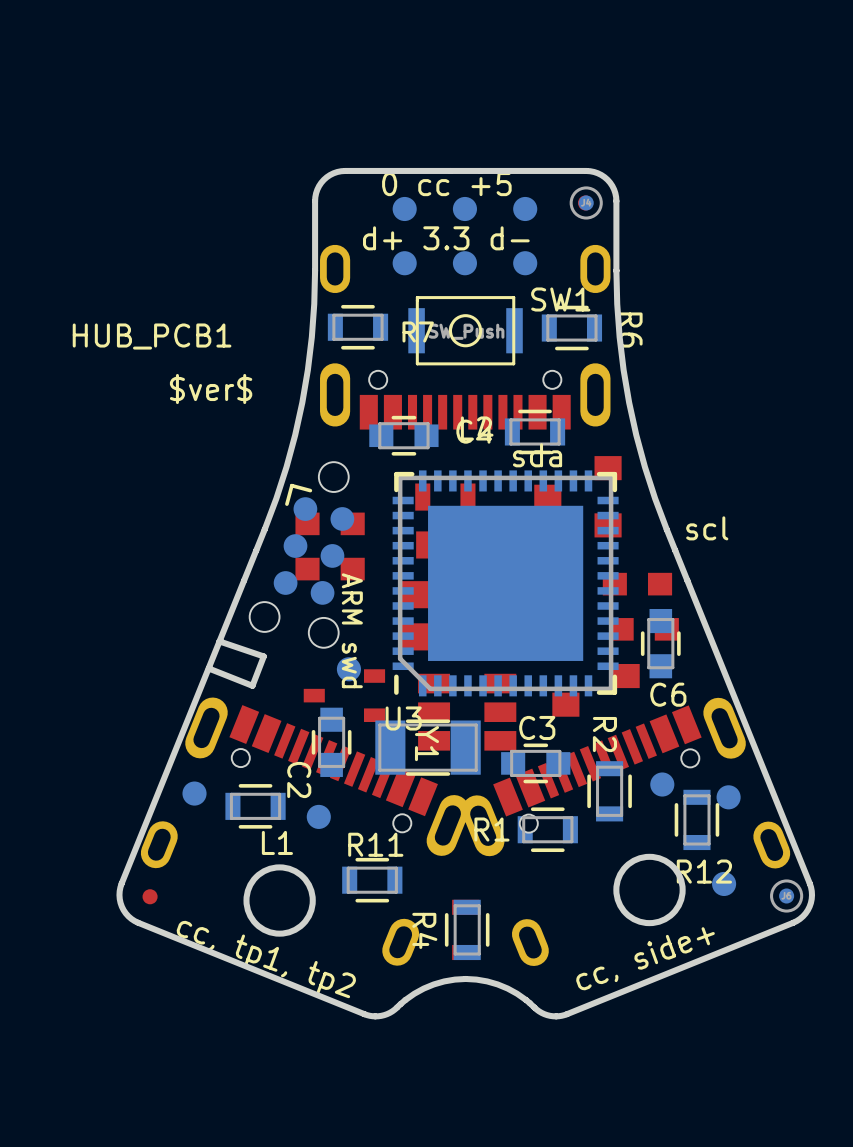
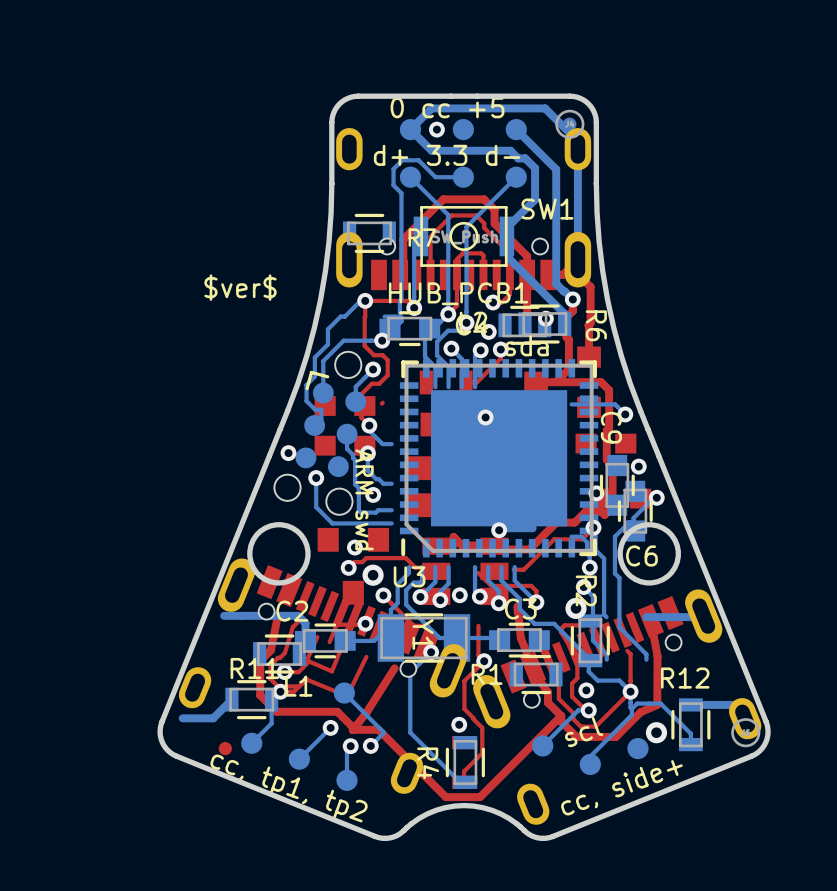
via: none -> (436, 129)
bottom track: none -> (516, 129) (556, 169) (556, 283) (572, 299)
bottom track: none -> (410, 177) (448, 215) (448, 314) (425, 337) (425, 356) (435, 367) (435, 387)
bottom track: none -> (463, 177) (435, 177) (418, 160) (402, 160) (393, 169) (393, 185) (401, 193) (401, 299) (399, 301) (401, 317)
bottom track: none -> (516, 177) (466, 226) (466, 322) (458, 330) (448, 330) (437, 341) (437, 355) (448, 366) (448, 387)
R6 position: (571, 328) -> (544, 324)
bottom track: none -> (418, 236) (414, 241) (414, 308)
text position: HUB_PCB1 (152, 336) -> HUB_PCB1 (458, 293)
part position: (465, 337) -> (463, 209)
bottom track: none -> (577, 259) (577, 141) (545, 108) (431, 108) (410, 129) (431, 150) (510, 150) (518, 158) (525, 158) (535, 168) (535, 199) (508, 225) (508, 258) (564, 314) (564, 324)
top track: none -> (400, 274) (403, 271) (403, 239) (443, 199) (484, 199) (494, 209) (494, 223) (527, 256) (527, 317)
top track: none -> (430, 274) (430, 236) (451, 215) (476, 215) (484, 223) (484, 227) (509, 253) (509, 294) (501, 302) (493, 302)
top track: none -> (483, 274) (483, 255) (481, 253) (462, 253) (457, 259) (457, 305) (448, 314)
top track: none -> (548, 274) (562, 274) (577, 259) (577, 274) (590, 286) (589, 357)
top track: none -> (572, 299) (572, 311) (566, 317) (568, 369) (555, 382)
via: none -> (572, 299)
bottom track: none -> (365, 300) (360, 300) (344, 316) (340, 316) (327, 329) (327, 344) (314, 357) (314, 376) (306, 384) (306, 401) (315, 409) (321, 409) (321, 418) (314, 425)
via: none -> (365, 300)
via: none -> (493, 302)
top track: none -> (414, 308) (407, 300) (365, 300) (364, 345) (373, 355) (382, 355) (387, 360) (387, 375) (379, 383) (371, 383) (361, 394) (361, 417) (369, 425)
via: none -> (414, 308)
via: none -> (448, 314)
bottom track: none -> (384, 316) (401, 317)
bottom track: none -> (401, 317) (401, 321) (382, 340) (343, 340) (323, 361) (323, 393)
via: none -> (545, 318)
via: none -> (466, 322)
via: none -> (488, 331)
via: none -> (382, 340)
bottom track: none -> (451, 348) (461, 358) (461, 387)
via: none -> (451, 348)
top track: none -> (500, 349) (500, 358) (476, 382) (466, 382)
via: none -> (500, 349)
bottom track: none -> (480, 350) (475, 356) (475, 387)
via: none -> (480, 350)
bottom track: none -> (373, 369) (355, 386) (355, 401)
via: none -> (373, 369)
top track: none -> (382, 402) (381, 403)
bottom track: none -> (571, 404) (615, 404) (625, 414)
text rotation: 0° (707, 528) -> 20° counterclockwise (584, 732)
text position: scl (707, 528) -> scl (584, 732)
via: none -> (625, 414)
via: none -> (485, 417)
top track: none -> (545, 423) (536, 414) (536, 382) (601, 382) (609, 390) (606, 459) (612, 465) (612, 507) (604, 514) (601, 511) (585, 511) (574, 522) (556, 522) (529, 549) (497, 549) (493, 545) (462, 545) (453, 536) (453, 545)
bottom track: none -> (369, 425) (369, 430) (382, 444) (391, 444)
via: none -> (369, 425)
bottom track: none -> (347, 434) (347, 448) (355, 460) (355, 484) (358, 488) (358, 510) (361, 512) (375, 512) (378, 510) (391, 510)
via: none -> (288, 453)
bottom track: none -> (367, 453) (367, 470) (383, 483) (391, 483)
via: none -> (367, 453)
part position: (637, 584) -> (605, 443)
via: none -> (638, 466)
bottom track: none -> (316, 478) (316, 507) (332, 523) (391, 523)
via: none -> (316, 478)
C9: none -> (617, 485)
via: none -> (596, 493)
via: none -> (373, 494)
bottom track: none -> (656, 497) (653, 497) (633, 518) (633, 520) (629, 522) (614, 536) (614, 573) (619, 577) (619, 627) (646, 654) (646, 659)
via: none -> (656, 497)
board edge: (219, 641) (263, 656) (252, 685) (208, 668) -> none
bottom track: none -> (593, 527) (595, 529) (595, 550) (604, 558) (604, 614) (606, 617)
top track: none -> (593, 527) (581, 539) (554, 539) (523, 569) (513, 569)
via: none -> (593, 527)
bottom track: none -> (532, 528) (501, 528) (499, 530)
via: none -> (499, 530)
part footprint: [303, 669, 386, 722] -> [317, 527, 390, 605]
part: (348, 669) -> none
bottom track: none -> (571, 536) (581, 536) (587, 542) (589, 567)
part: (596, 676) -> none
via: none -> (354, 547)
bottom track: none -> (408, 567) (408, 573) (397, 584) (397, 603) (390, 609) (390, 638)
bottom track: none -> (422, 567) (422, 580) (420, 582) (413, 582) (406, 590) (406, 604) (439, 638) (497, 638) (499, 640)
top track: none -> (428, 567) (415, 567) (405, 558) (366, 558) (362, 562) (354, 562) (348, 567)
bottom track: none -> (435, 567) (435, 582) (420, 596)
bottom track: none -> (448, 567) (448, 583) (440, 591) (440, 600)
bottom track: none -> (475, 567) (475, 591) (479, 596)
bottom track: none -> (488, 567) (488, 580) (498, 591) (498, 603)
bottom track: none -> (501, 567) (501, 580) (519, 598) (519, 608) (534, 623) (554, 623) (588, 658) (588, 671) (597, 680) (619, 680) (630, 691) (631, 708)
bottom track: none -> (514, 567) (514, 580) (536, 602)
via: none -> (589, 567)
via: none -> (348, 567)
top track: none -> (478, 573) (491, 585) (531, 585) (536, 591) (536, 602)
via: none -> (373, 575)
bottom track: none -> (583, 587) (593, 596) (593, 640) (606, 654) (606, 659)
via: none -> (583, 587)
top track: none -> (383, 595) (413, 625) (428, 625)
via: none -> (383, 595)
via: none -> (459, 595)
via: none -> (479, 596)
via: none -> (420, 596)
C2 rotation: 0° (331, 742) -> 90° clockwise (325, 640)
C2 position: (331, 742) -> (325, 640)
via: none -> (440, 600)
Y1 position: (428, 747) -> (423, 638)
via: none -> (536, 602)
via: none -> (498, 603)
via: none -> (576, 608)
top track: none -> (517, 611) (517, 606) (520, 638) (533, 668) (547, 692) (547, 702) (561, 715)
bottom track: none -> (224, 615) (298, 615) (305, 623) (305, 640)
C3 position: (535, 763) -> (519, 640)
bottom track: none -> (703, 616) (646, 617)
top track: none -> (276, 620) (270, 650) (260, 661) (260, 695) (276, 711) (337, 711) (352, 727) (352, 730) (366, 712) (394, 668)
top track: none -> (650, 621) (657, 656) (657, 704) (640, 712) (615, 736) (576, 736) (561, 721) (561, 715)
top track: none -> (297, 622) (292, 627) (284, 653) (270, 665) (270, 678) (277, 686) (299, 686)
top track: none -> (365, 623) (363, 626) (362, 624) (336, 624) (329, 642)
via: none -> (365, 623)
top track: none -> (478, 625) (478, 655) (484, 661) (464, 680) (464, 708) (482, 727) (482, 753) (464, 771) (464, 782)
bottom track: none -> (387, 626) (373, 640) (345, 640)
part: (662, 784) -> none
top track: none -> (317, 637) (306, 660) (331, 671) (341, 647)
part: (194, 793) -> none
top track: none -> (598, 642) (590, 623) (564, 625) (562, 627) (560, 632) (577, 655) (577, 678) (572, 683) (572, 696) (585, 710) (588, 710)
part: (728, 797) -> none
top track: none -> (627, 650) (630, 654) (630, 691) (595, 726) (580, 726) (573, 719) (573, 713) (558, 698) (558, 679) (549, 662)
bottom track: none -> (431, 652) (410, 673) (410, 732) (460, 782) (465, 782)
via: none -> (431, 652)
top track: none -> (366, 656) (347, 696) (306, 679) (293, 691) (280, 691)
top track: none -> (309, 661) (298, 672) (284, 672)
via: none -> (484, 661)
part position: (318, 816) -> (344, 693)
R12 position: (696, 819) -> (690, 724)
via: none -> (284, 672)
part position: (626, 831) -> (617, 707)
via: none -> (586, 690)
via: none -> (280, 691)
via: none -> (630, 691)
bottom track: none -> (344, 693) (384, 732) (370, 745)
bottom track: none -> (231, 699) (213, 718) (182, 718)
bottom track: none -> (271, 699) (271, 723) (251, 743)
bottom track: none -> (690, 704) (731, 704) (745, 718)
bottom track: none -> (631, 708) (631, 714) (590, 756) (590, 764)
bottom track: none -> (631, 708) (637, 703) (660, 703) (690, 733) (690, 744) (685, 744)
bottom track: none -> (588, 710) (578, 710) (542, 745)
via: none -> (588, 710)
R12 name position: R12 (704, 871) -> R12 (685, 678)
top track: none -> (561, 715) (480, 797) (445, 797) (378, 729) (353, 729)
R11 position: (372, 880) -> (251, 699)
part: (724, 883) -> none
via: none -> (459, 724)
round board edge position: (649, 889) -> (649, 553)
bottom track: none -> (330, 727) (299, 759)
via: none -> (330, 727)
part position: (150, 896) -> (225, 748)
via: none -> (656, 732)
round board edge position: (279, 900) -> (278, 553)
part: none -> (251, 743)
bottom track: none -> (350, 746) (346, 749) (346, 780)
via: none -> (350, 746)
via: none -> (370, 745)
part: none -> (542, 745)
part: none -> (637, 748)
part: none -> (299, 759)
part: none -> (590, 764)
part: none -> (346, 780)

